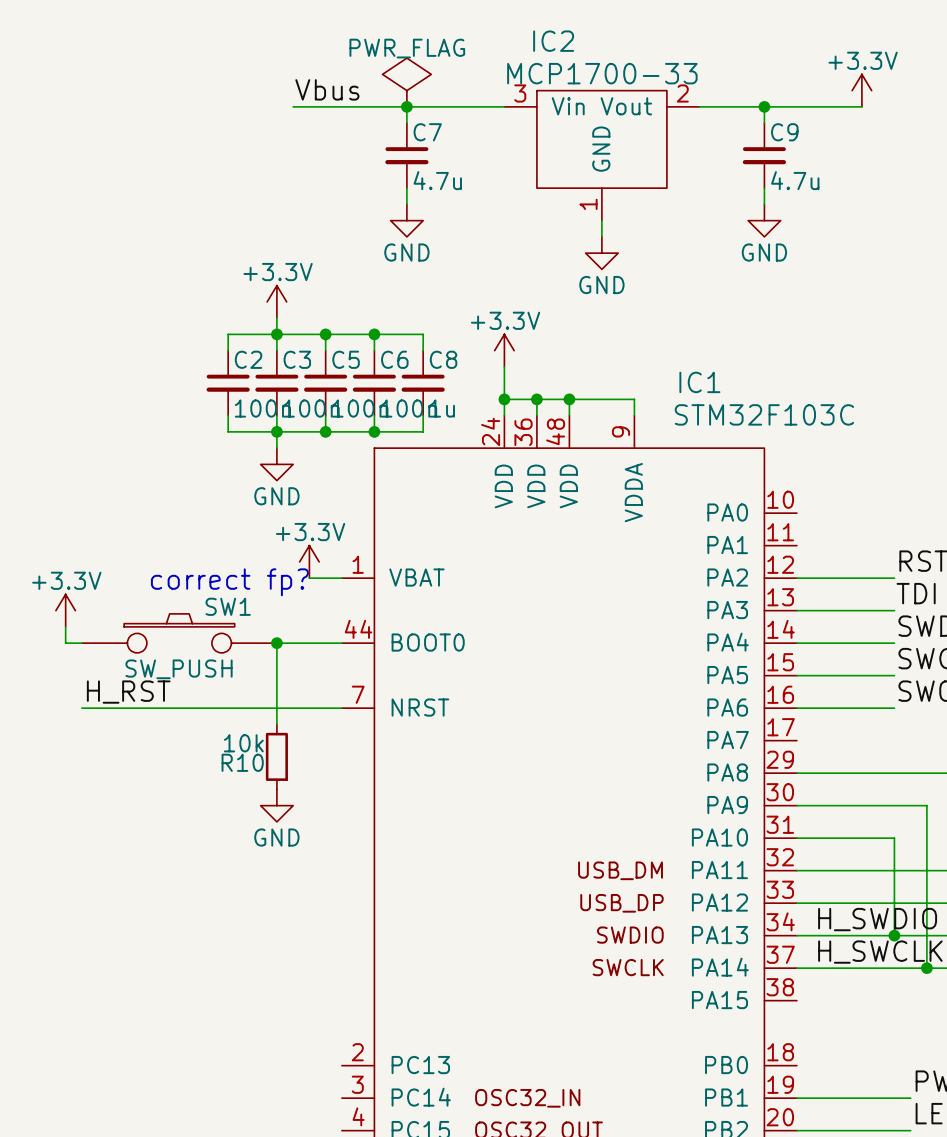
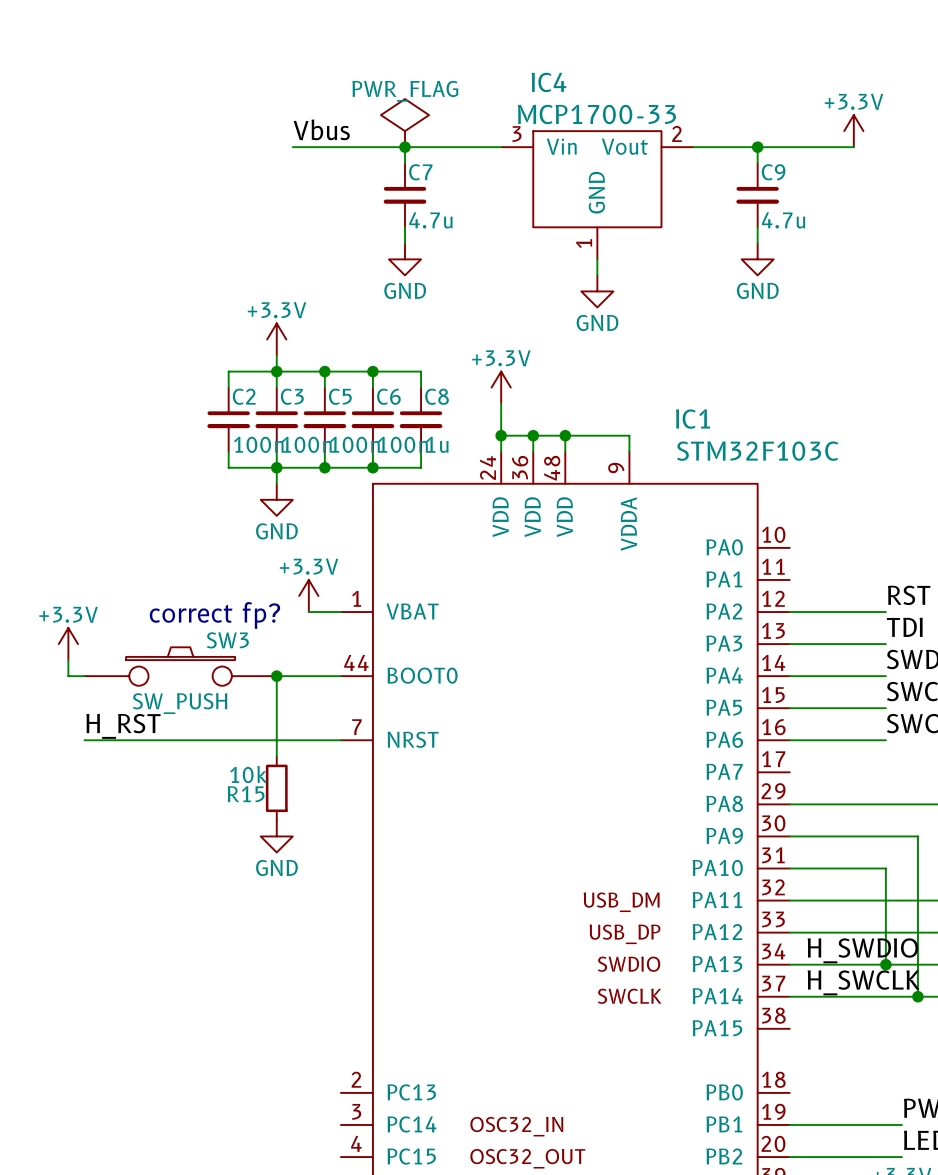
IC2 name: IC2 (553, 41) -> IC4 (549, 82)
SW1 name: SW1 (228, 606) -> SW3 (227, 640)
R10 name: R10 (242, 762) -> R15 (246, 794)

